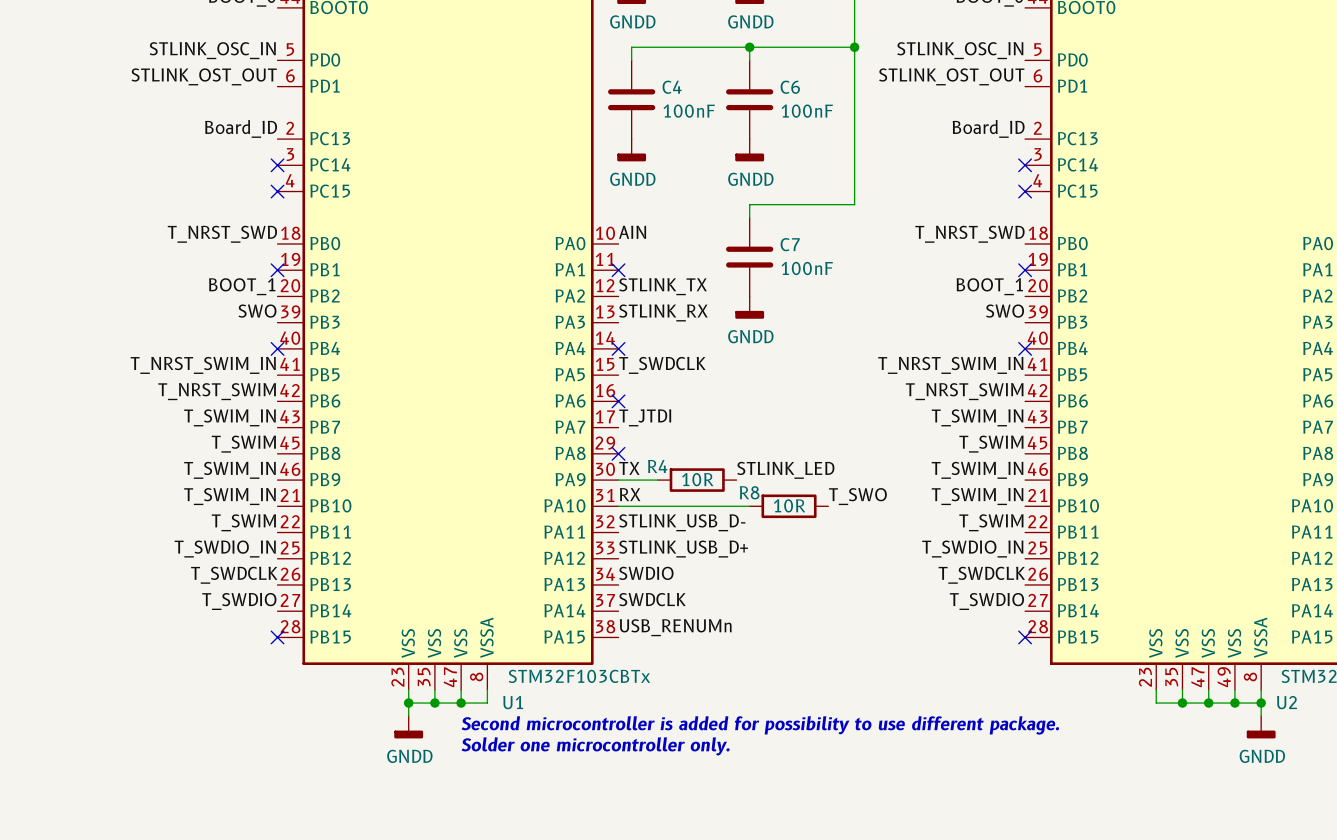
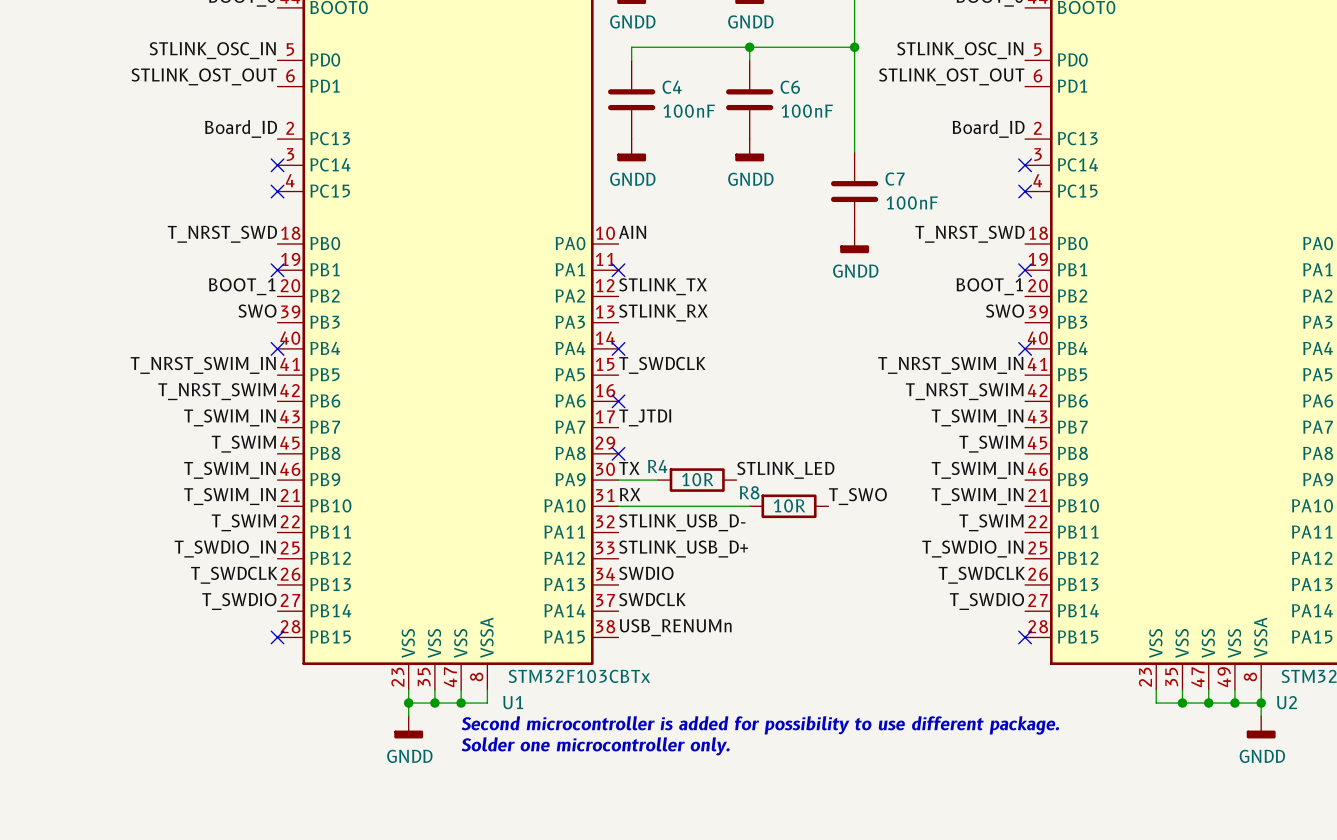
wire: (854, 152) (854, 204) (749, 204) (749, 217) -> none
C7 position: (749, 257) -> (854, 191)
power symbol position: GNDD (749, 307) -> GNDD (854, 242)

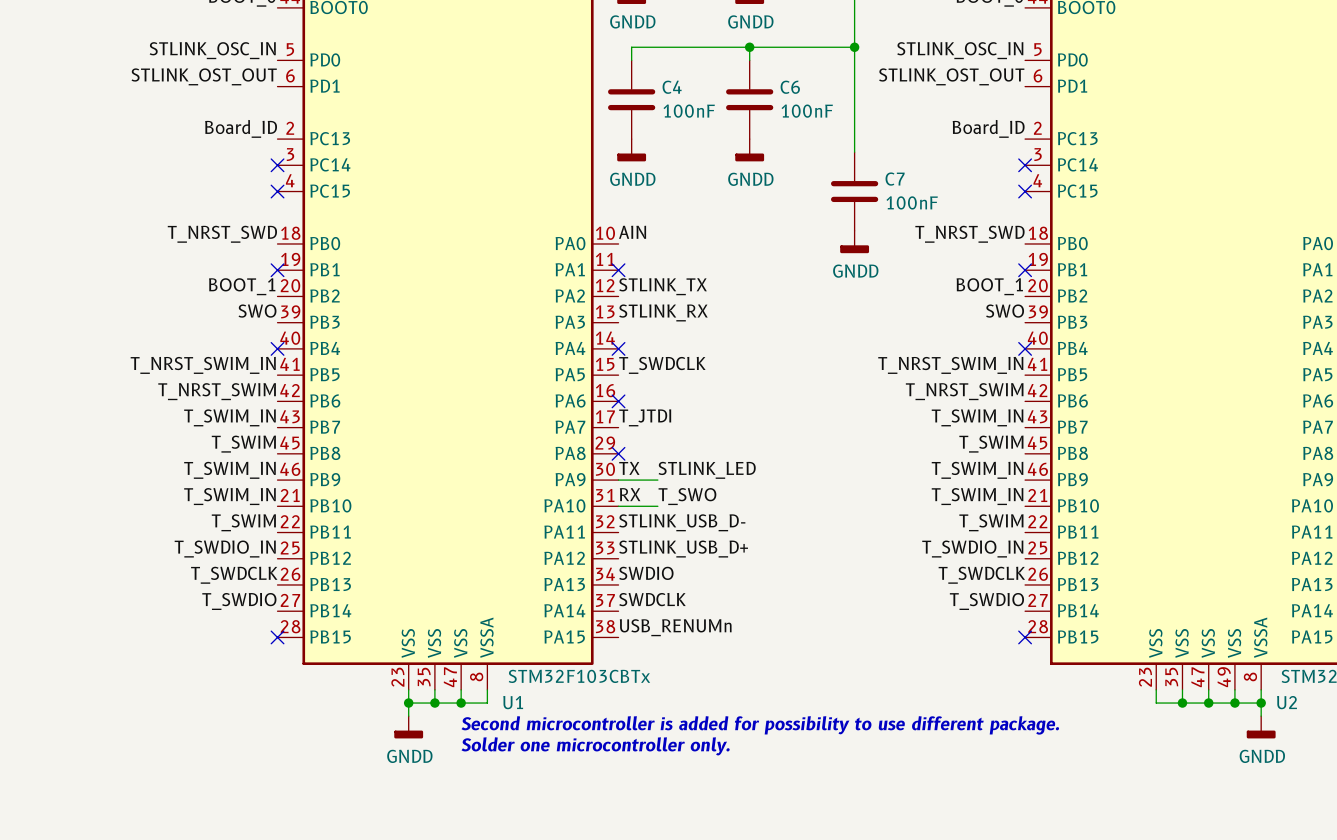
label position: STLINK_LED (785, 470) -> STLINK_LED (707, 470)
R4: 10R (697, 480) -> none
label position: T_SWO (857, 496) -> T_SWO (687, 496)
wire: (657, 506) (749, 506) -> none
R8: 10R (789, 506) -> none

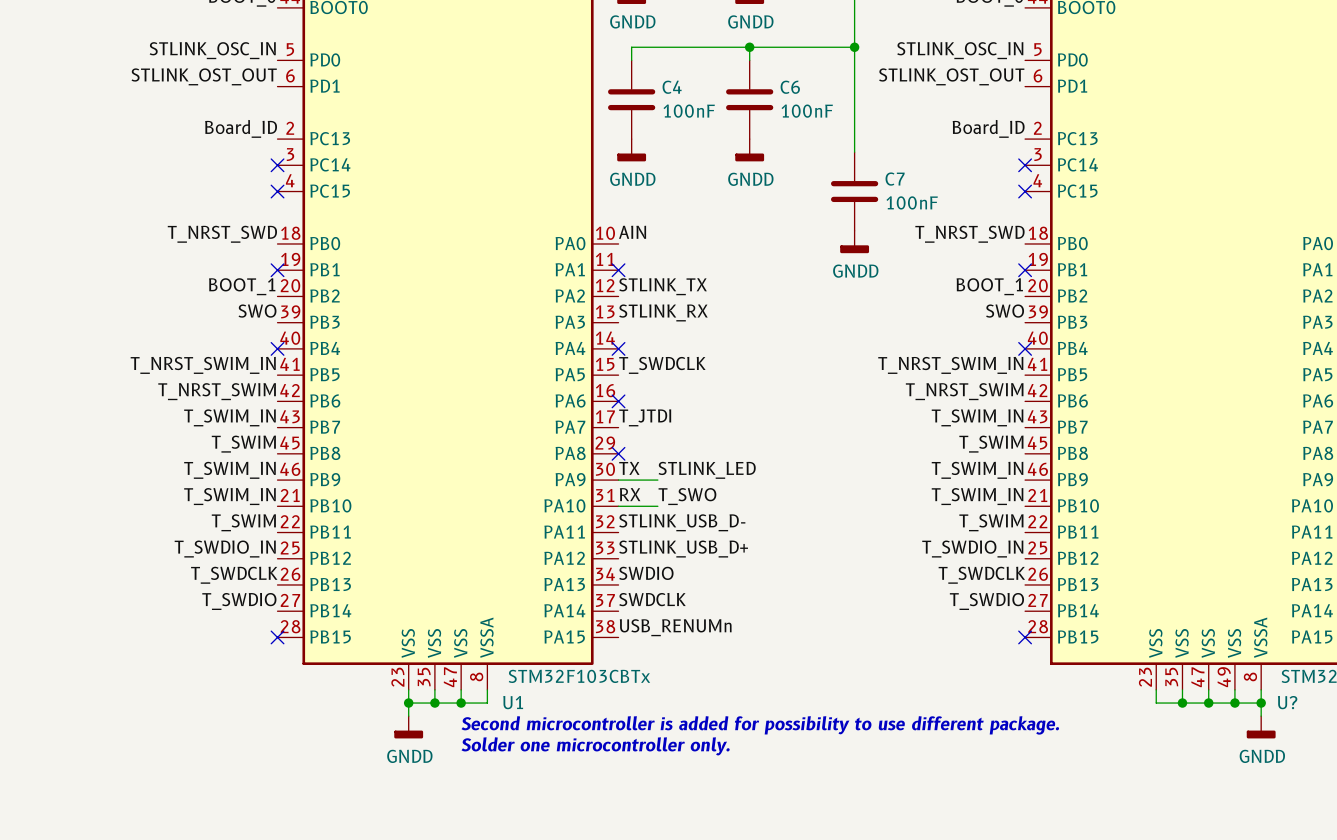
U2 name: U2 (1286, 702) -> U? (1287, 702)

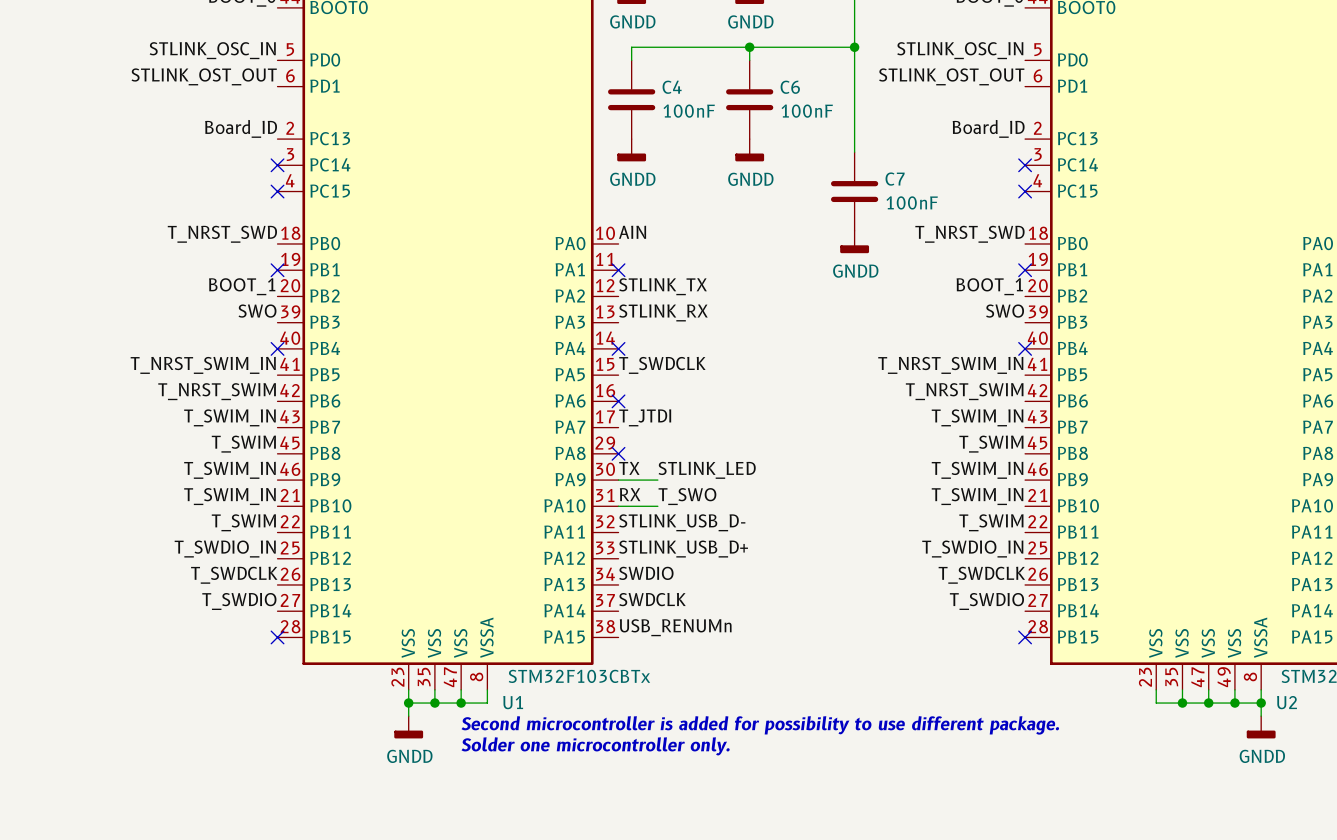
U? name: U? (1287, 702) -> U2 (1286, 702)

